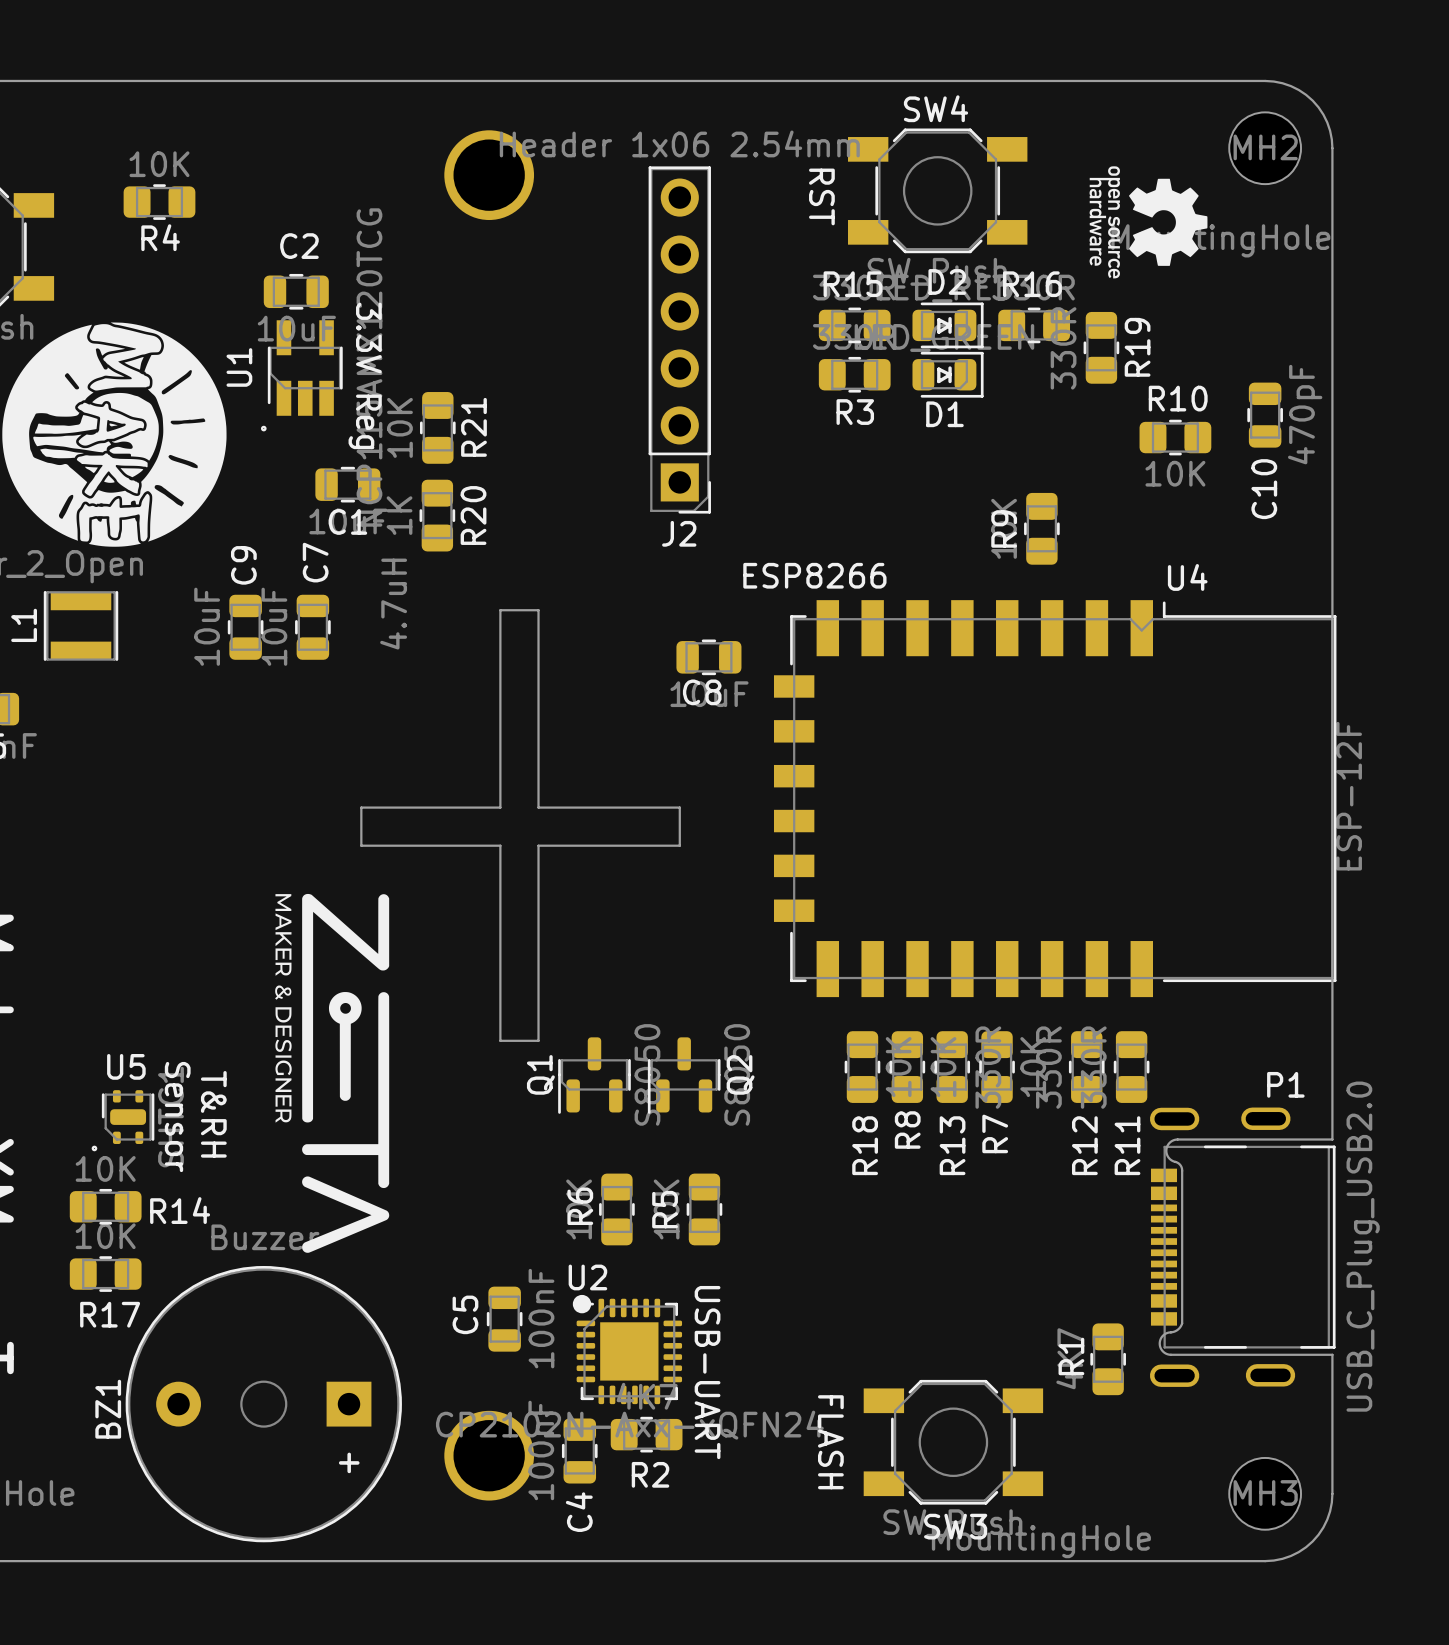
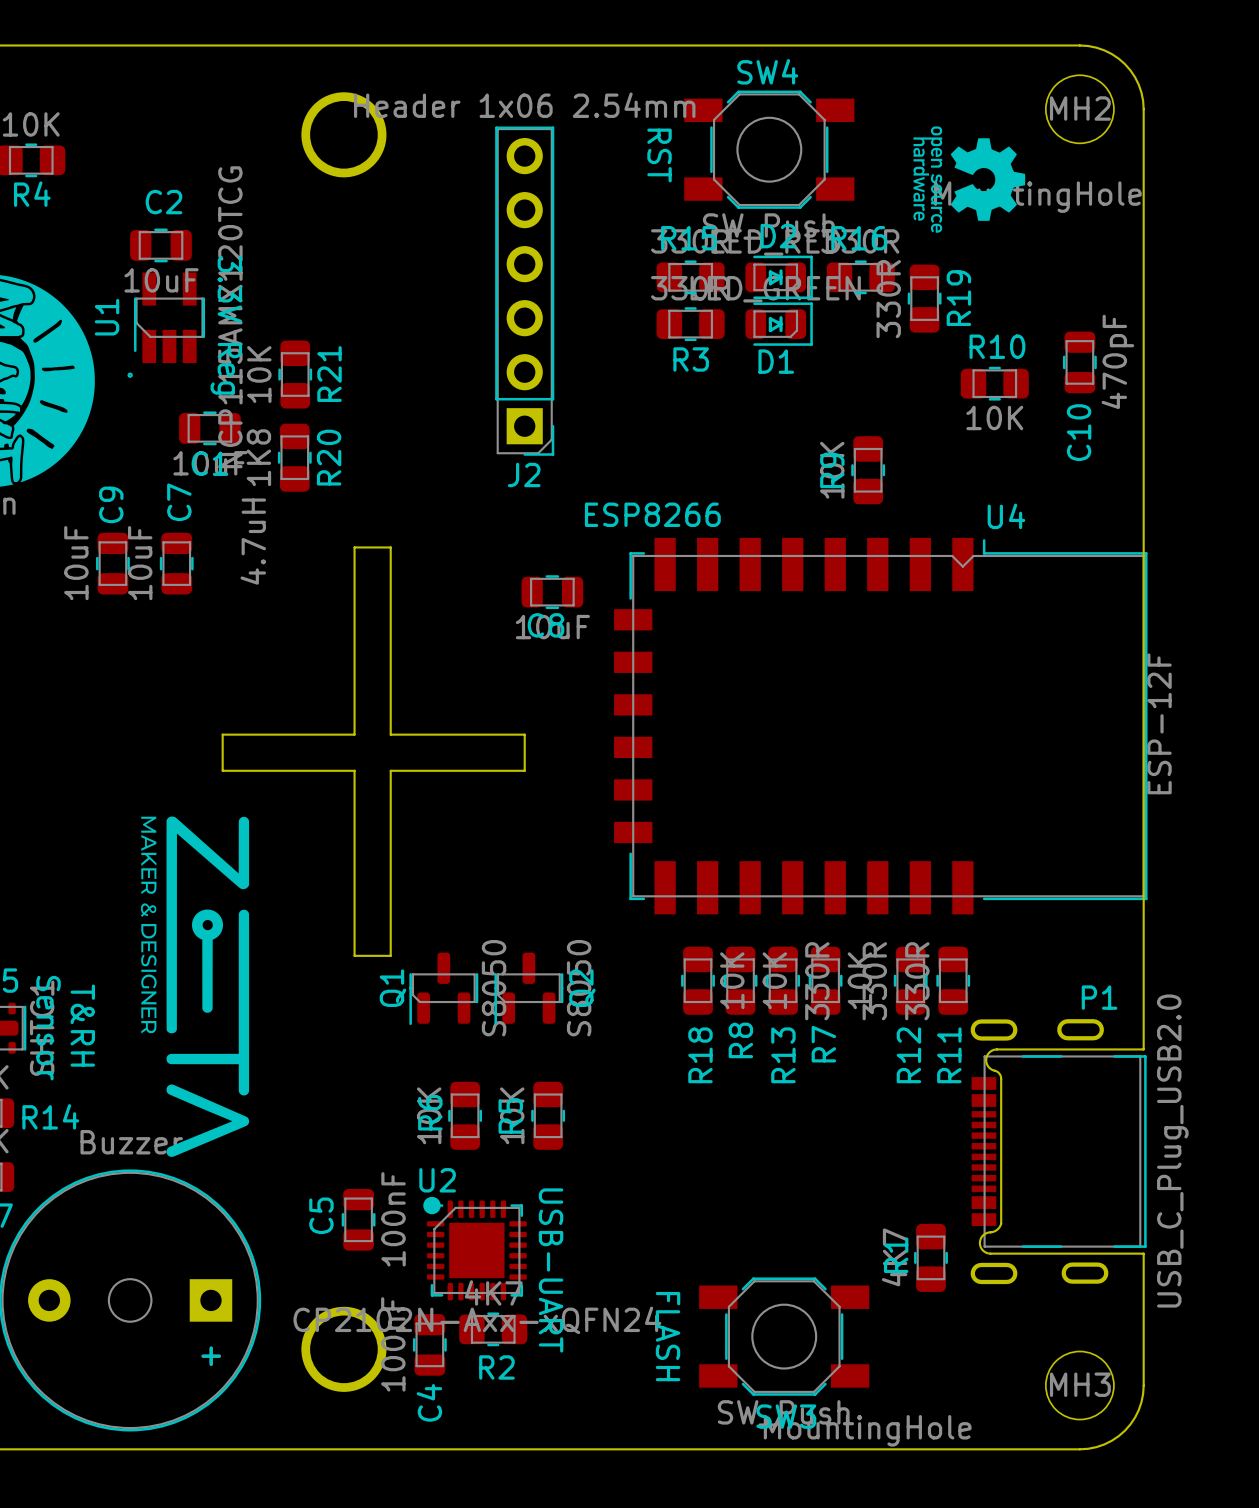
R20 value: 1K (399, 515) -> 1K8 (258, 457)

